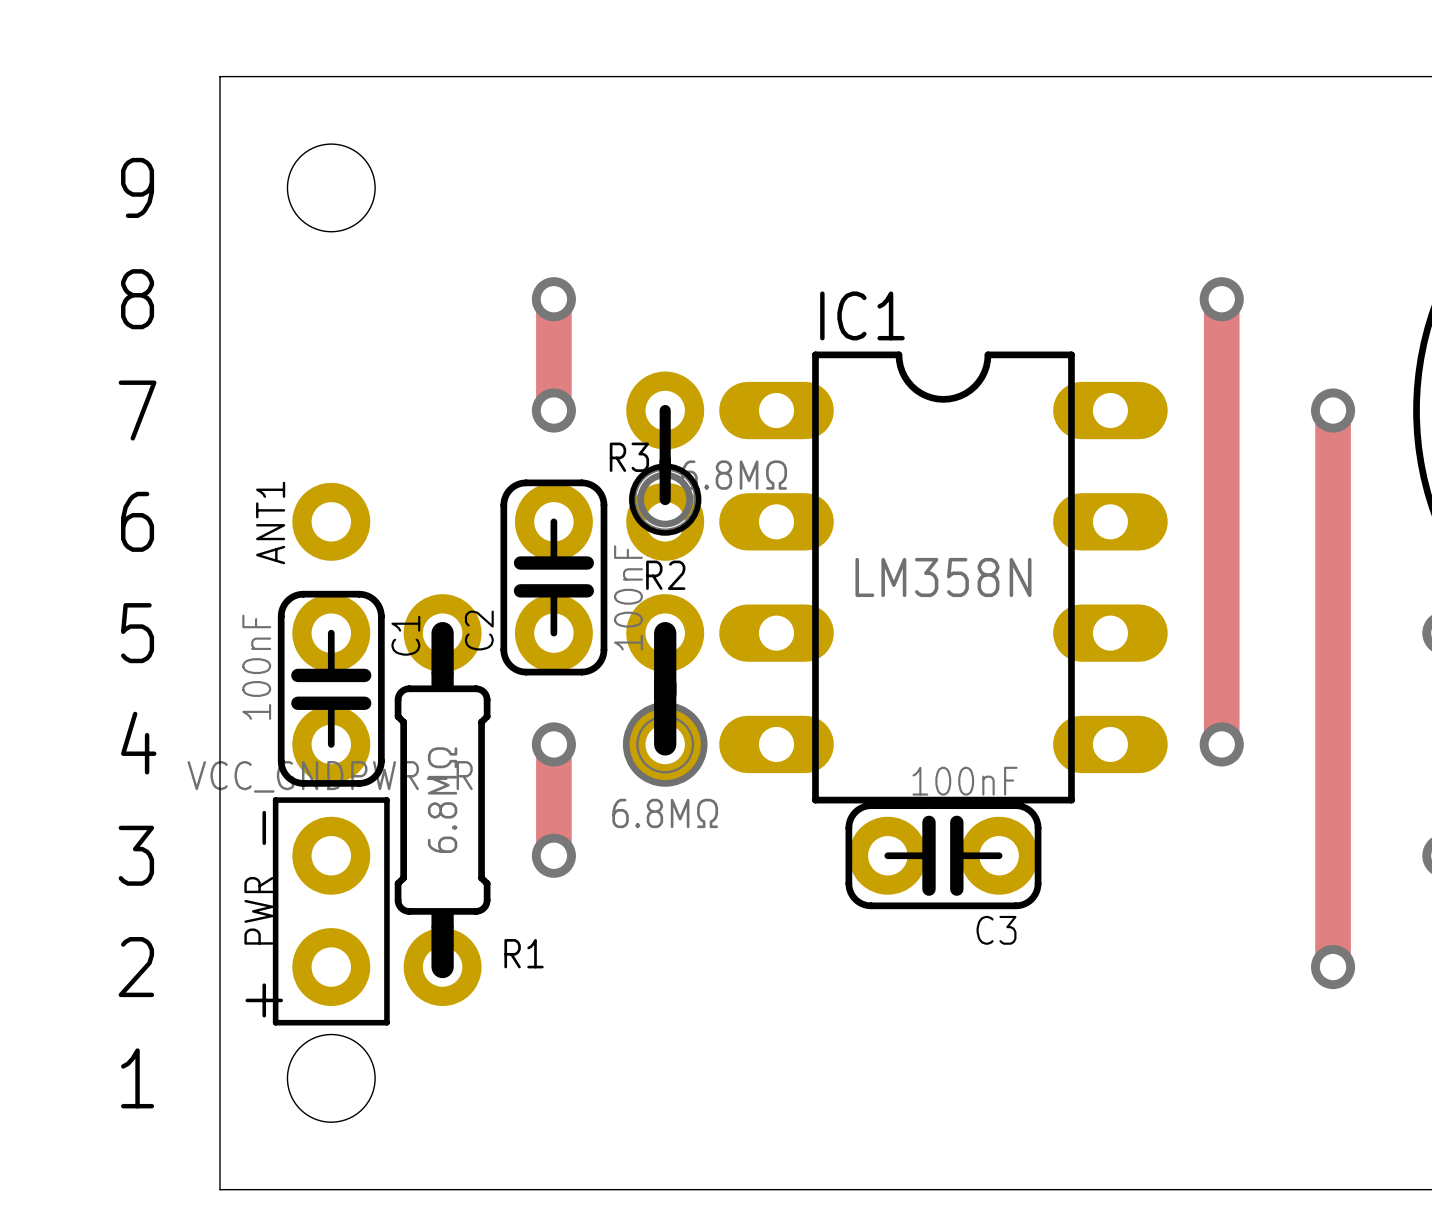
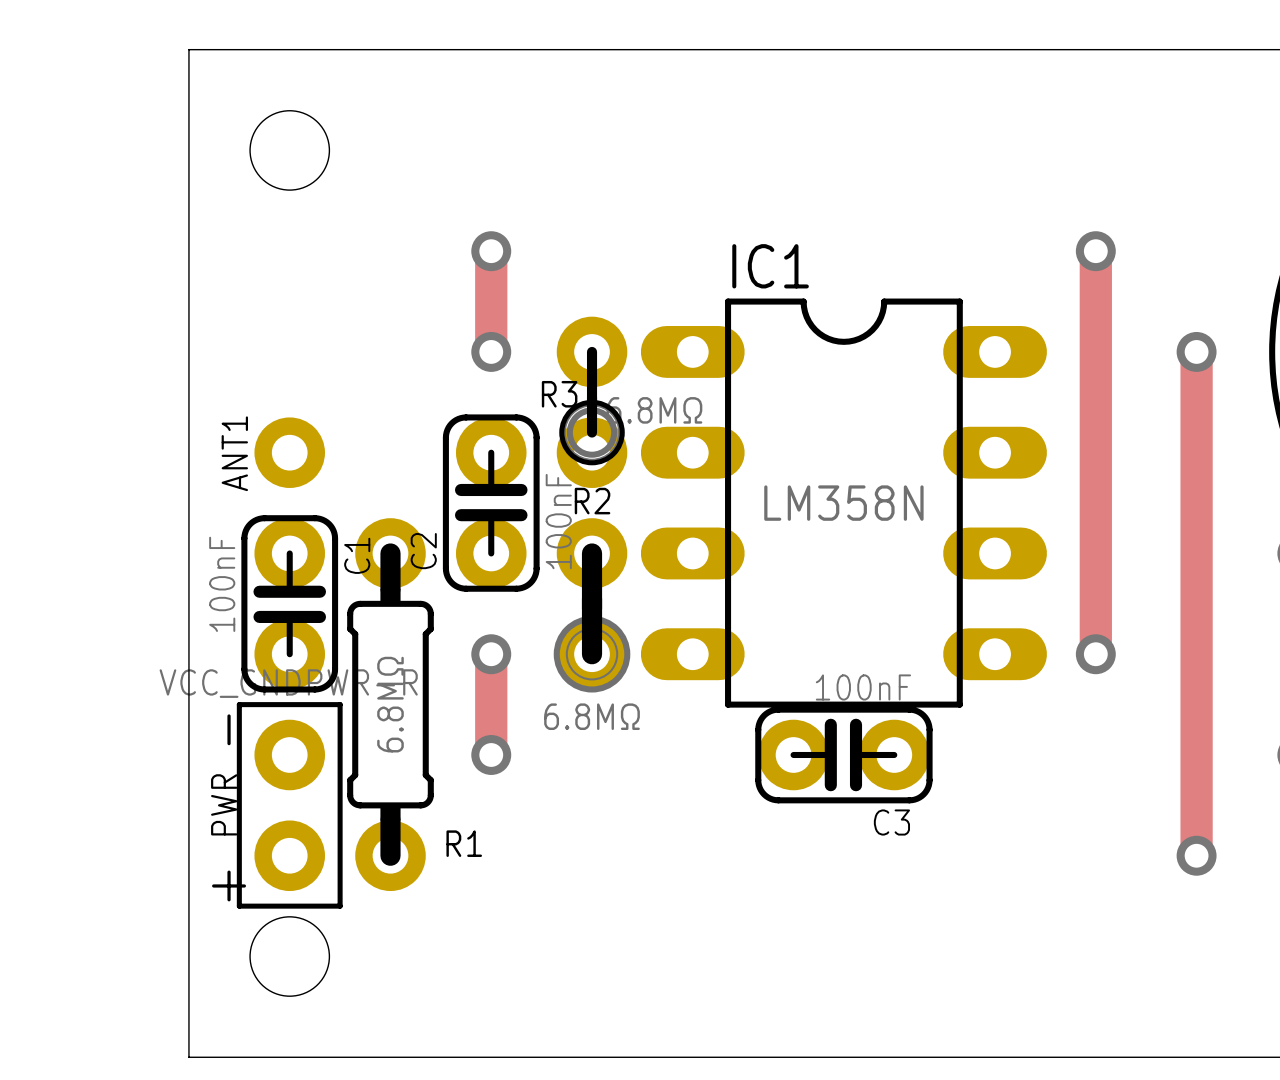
text: 9 (137, 187) -> none
text: 8 (137, 299) -> none
text: 7 (137, 410) -> none
text: 6 (137, 521) -> none
text: 5 (137, 633) -> none
text: 4 (138, 743) -> none
text: 3 (136, 855) -> none
text: 2 (136, 967) -> none
text: 1 (137, 1078) -> none

